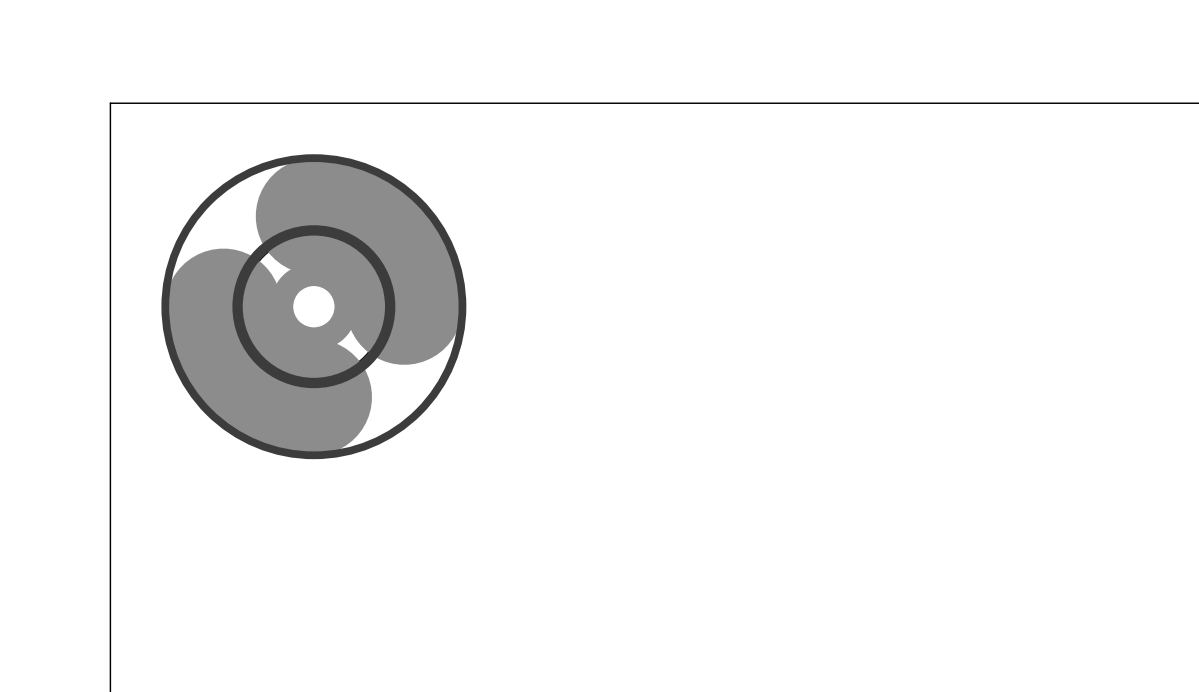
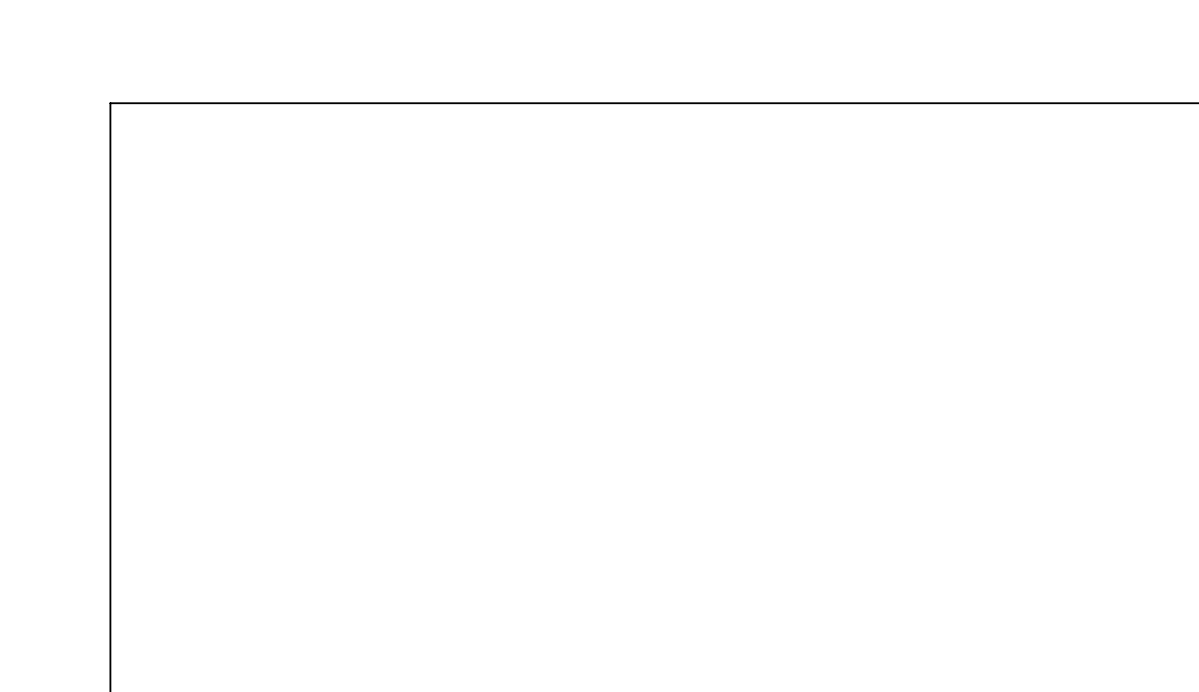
part: (313, 306) -> none

